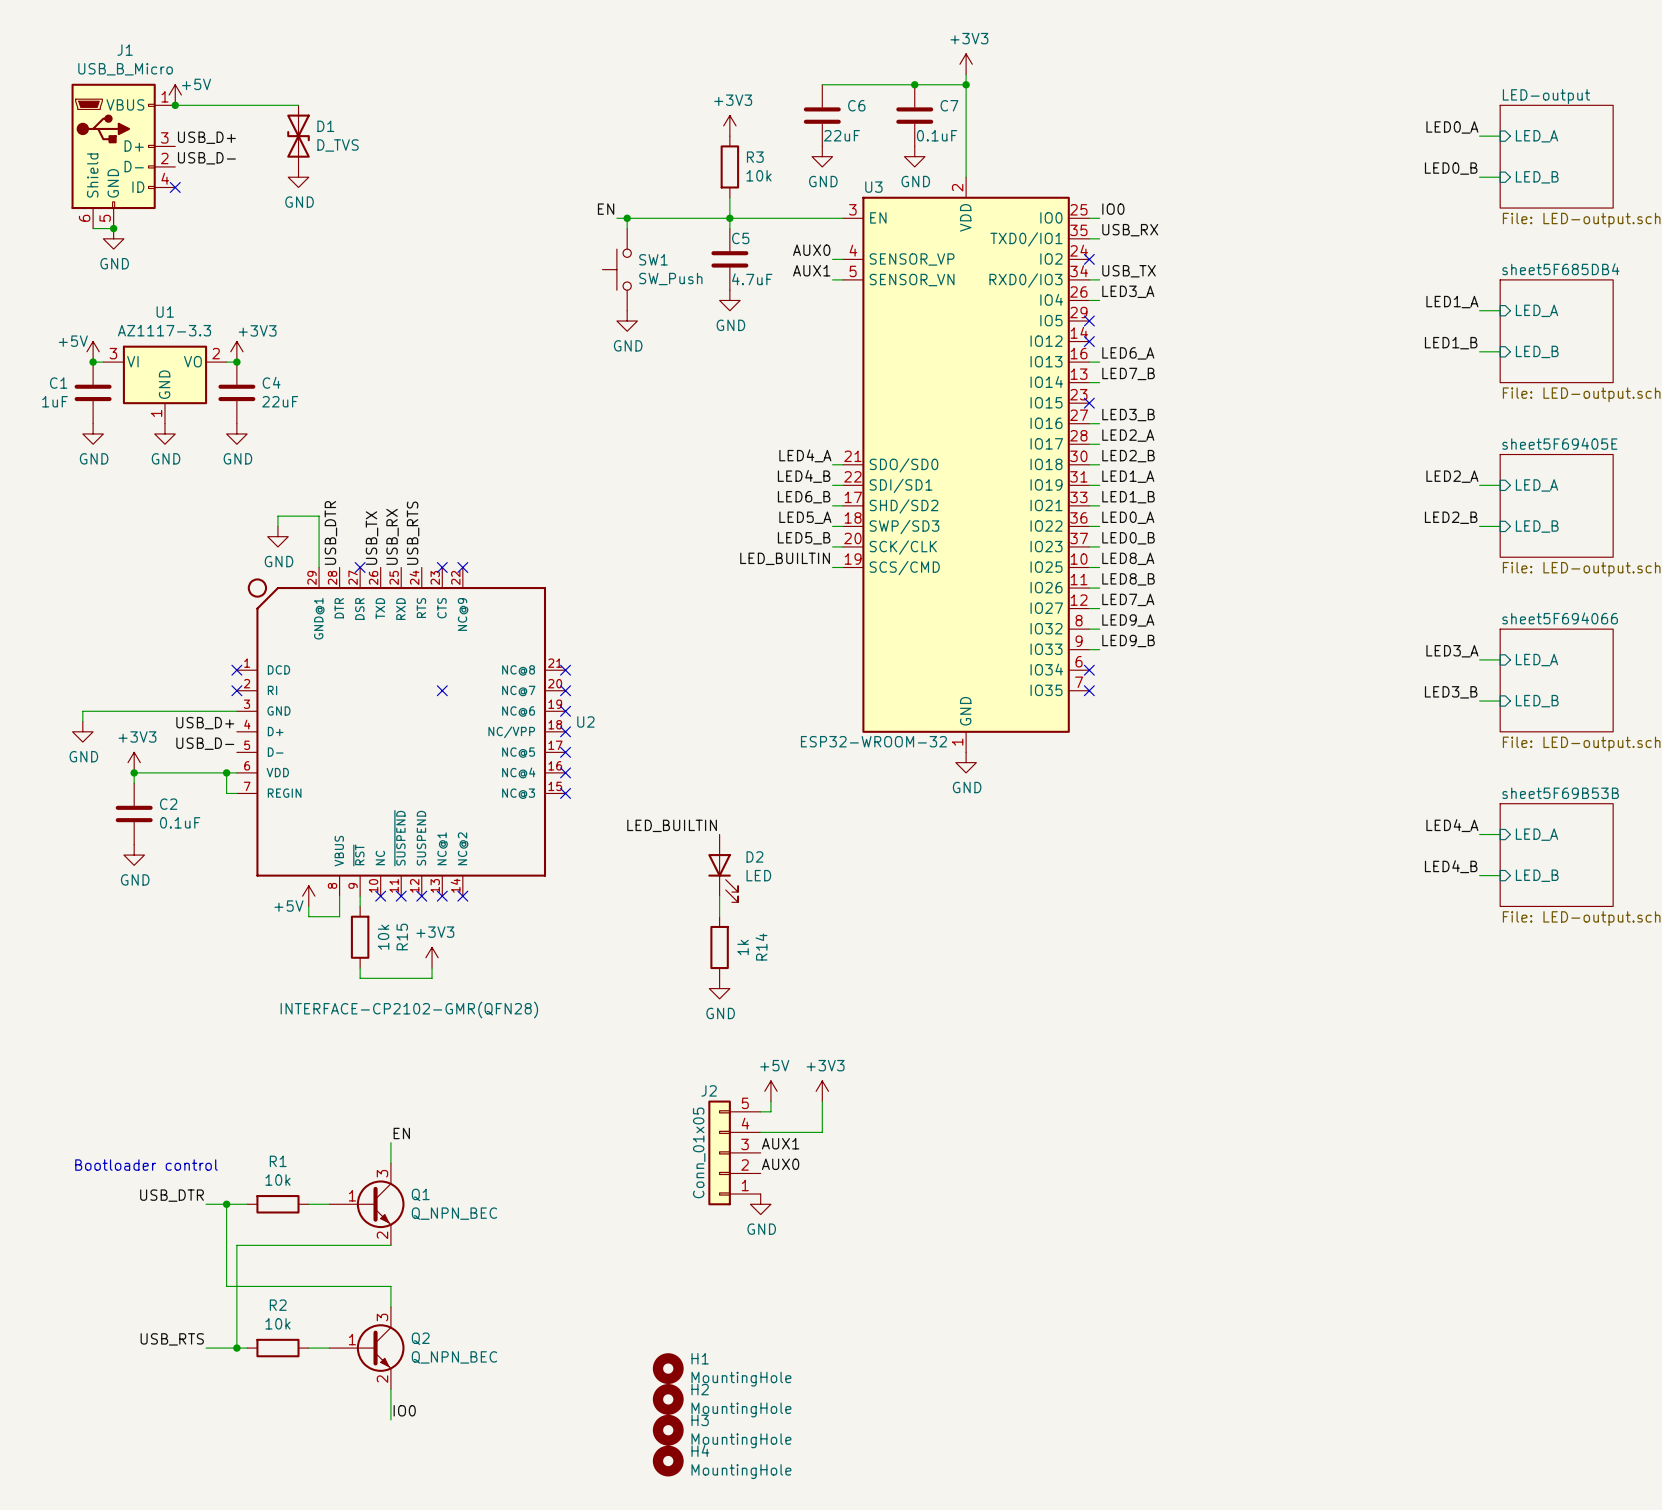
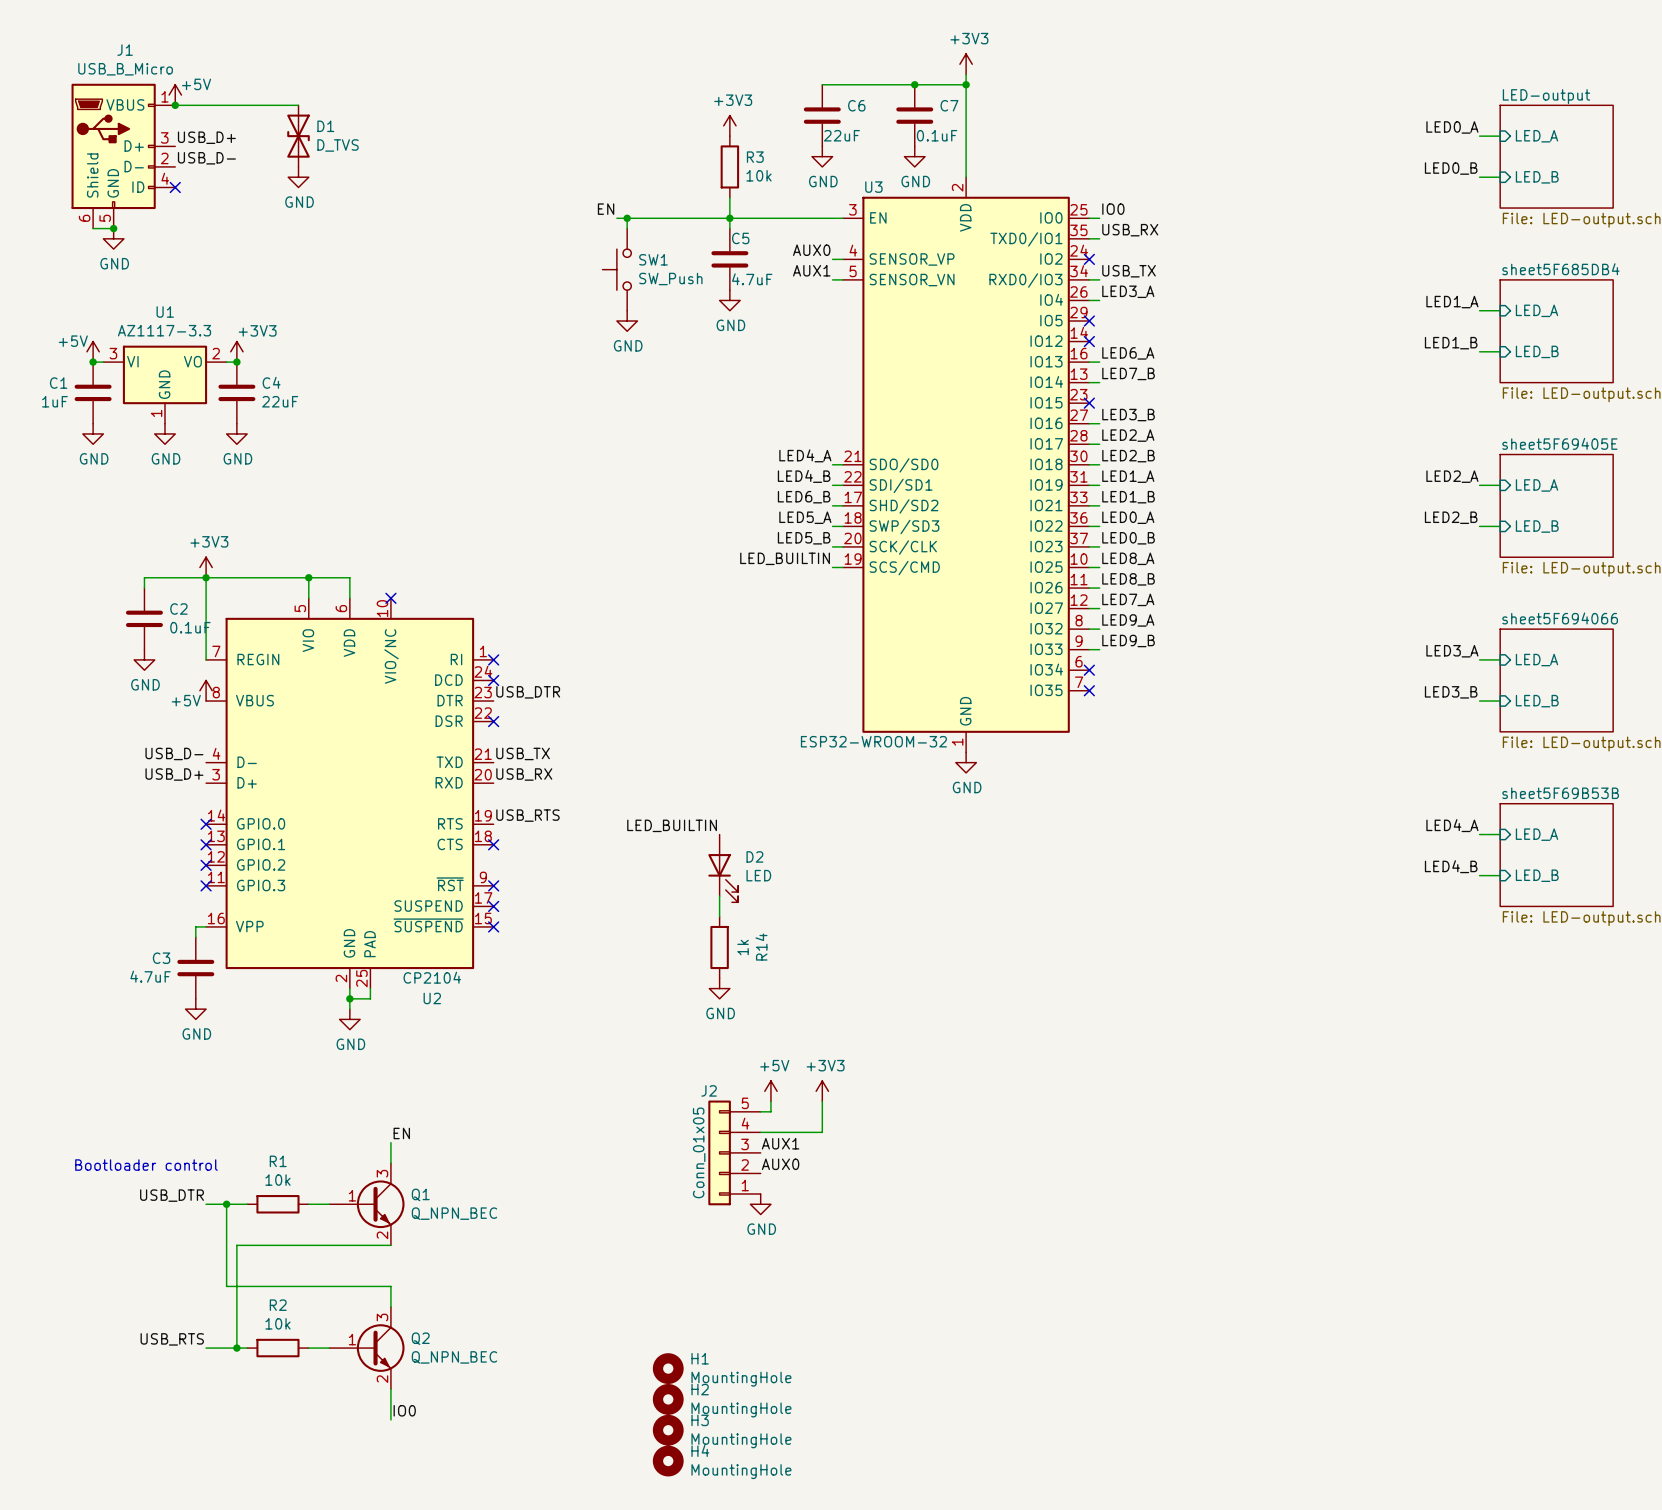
wire: (277, 526) (277, 516) (319, 516) (319, 567) -> none
label: USB_DTR (330, 532) -> none
label: USB_RTS (413, 533) -> none
power symbol: GND (277, 536) -> none
label: USB_RX (392, 536) -> none
label: USB_TX (372, 538) -> none
power symbol: none -> +3V3 (206, 567)
U2 symbol: [236, 567, 566, 897] -> [206, 598, 494, 989]
no-connect mark: (360, 567) -> none
no-connect mark: (442, 567) -> none
no-connect mark: (462, 567) -> none
wire: none -> (206, 577) (206, 659)
junction: none -> (206, 577)
wire: none -> (308, 577) (308, 598)
junction: none -> (308, 577)
wire: none -> (144, 588) (144, 577) (349, 577) (349, 598)
no-connect mark: none -> (390, 598)
power symbol: none -> GND (144, 659)
no-connect mark: none -> (493, 659)
no-connect mark: (236, 670) -> none
no-connect mark: (565, 670) -> none
no-connect mark: none -> (493, 680)
power symbol: none -> +5V (206, 690)
no-connect mark: (236, 690) -> none
no-connect mark: (442, 690) -> none
no-connect mark: (565, 690) -> none
label: none -> USB_DTR (528, 692)
wire: (236, 711) (82, 711) (82, 721) -> none
no-connect mark: (565, 711) -> none
no-connect mark: none -> (493, 721)
U2 name position: U2 (585, 721) -> U2 (432, 998)
label position: USB_D+ (205, 723) -> USB_D+ (174, 774)
power symbol: GND (82, 731) -> none
no-connect mark: (565, 731) -> none
label position: USB_D- (205, 743) -> USB_D- (174, 753)
no-connect mark: (565, 752) -> none
label: none -> USB_TX (523, 753)
power symbol: +3V3 (134, 762) -> none
junction: (134, 772) -> none
junction: (226, 772) -> none
wire: (236, 772) (134, 772) (134, 783) -> none
no-connect mark: (565, 772) -> none
label: none -> USB_RX (524, 774)
no-connect mark: (565, 793) -> none
C2 position: (134, 813) -> (144, 618)
label: none -> USB_RTS (527, 815)
no-connect mark: none -> (206, 824)
no-connect mark: none -> (206, 844)
no-connect mark: none -> (493, 844)
power symbol: GND (134, 855) -> none
no-connect mark: none -> (206, 865)
no-connect mark: none -> (206, 885)
no-connect mark: none -> (493, 885)
power symbol: +5V (308, 896) -> none
no-connect mark: (380, 896) -> none
no-connect mark: (401, 896) -> none
no-connect mark: (421, 896) -> none
no-connect mark: (442, 896) -> none
no-connect mark: (462, 896) -> none
no-connect mark: none -> (493, 906)
wire: none -> (206, 926) (195, 926) (195, 937)
no-connect mark: none -> (493, 926)
R15: 10k (360, 937) -> none
power symbol: +3V3 (432, 957) -> none
C3: none -> 4.7uF (195, 968)
wire: (360, 968) (360, 978) (432, 978) (432, 968) -> none
wire: none -> (349, 988) (349, 1009)
wire: none -> (370, 988) (370, 998) (349, 998)
junction: none -> (349, 998)
power symbol: none -> GND (195, 1009)
U2 value: INTERFACE-CP2102-GMR(QFN28) (409, 1009) -> CP2104 (432, 977)
power symbol: none -> GND (349, 1019)

